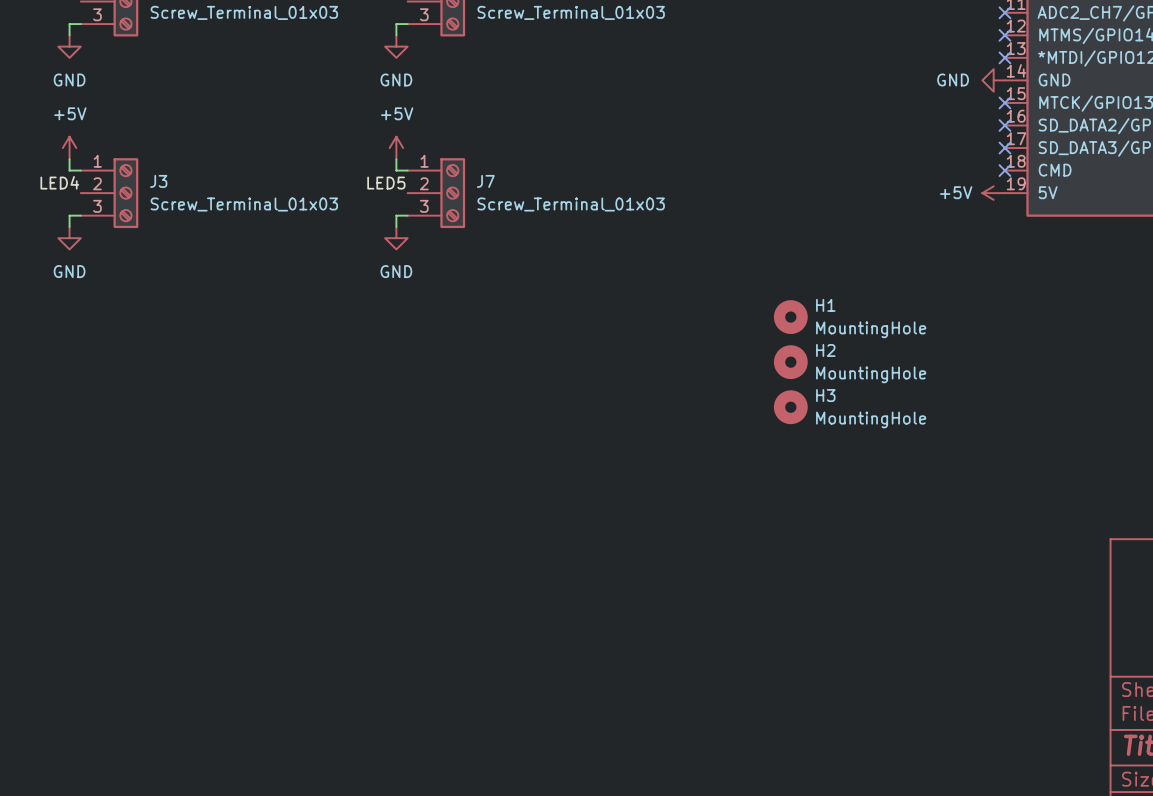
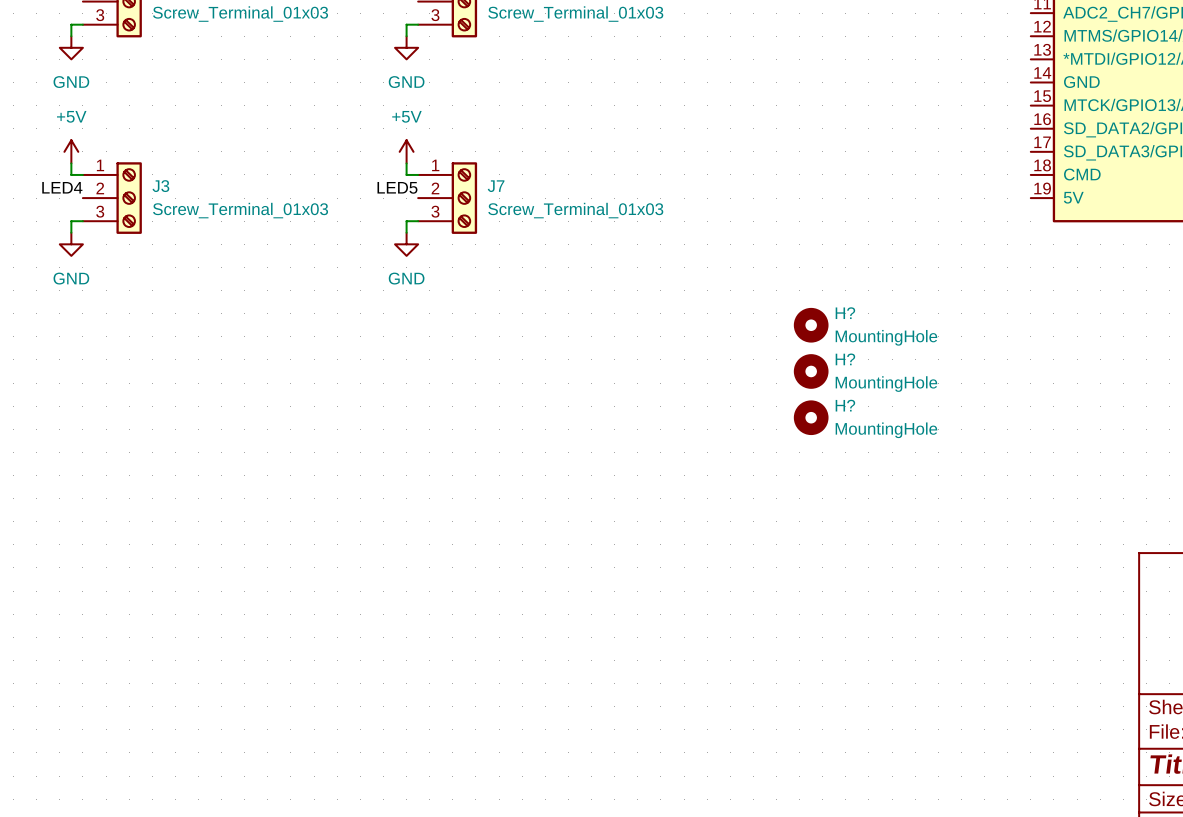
no-connect mark: (1004, 12) -> none
no-connect mark: (1004, 35) -> none
no-connect mark: (1004, 57) -> none
power symbol: GND (993, 80) -> none
no-connect mark: (1004, 102) -> none
no-connect mark: (1004, 125) -> none
no-connect mark: (1004, 148) -> none
no-connect mark: (1004, 170) -> none
power symbol: +5V (993, 193) -> none
H1 name: H1 (825, 305) -> H? (845, 313)
H2 name: H2 (825, 350) -> H? (845, 359)
H3 name: H3 (825, 395) -> H? (845, 405)

